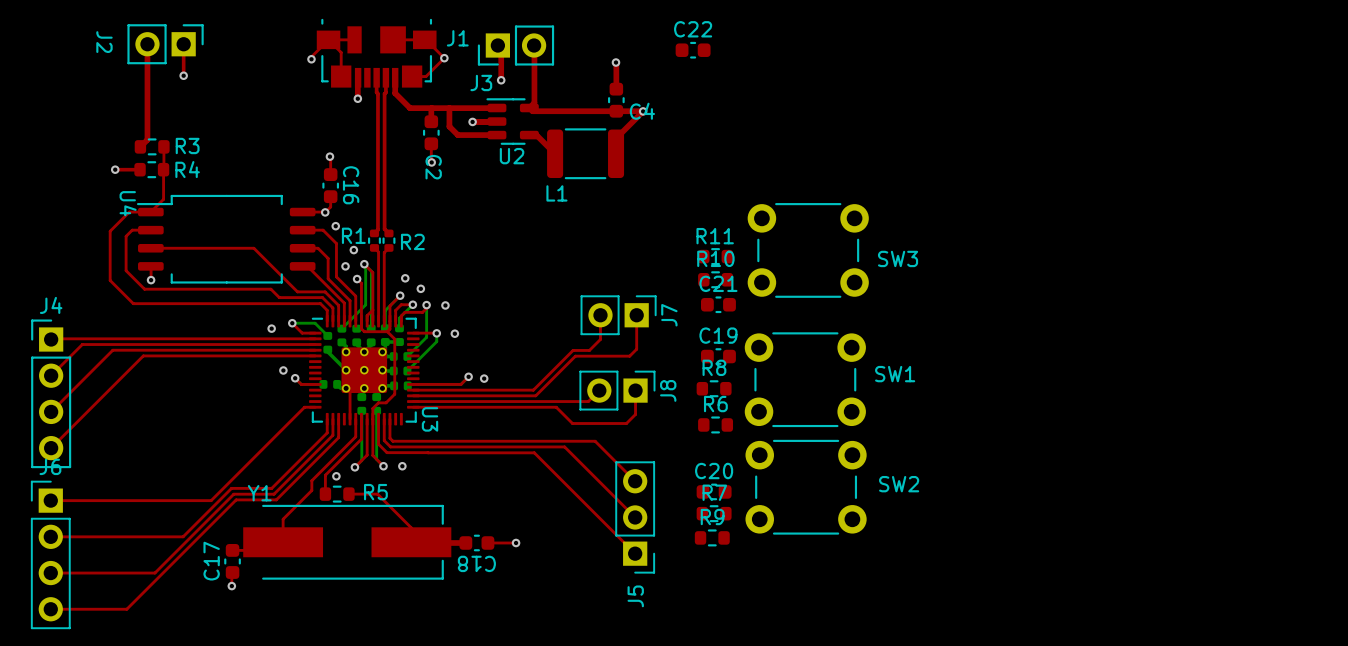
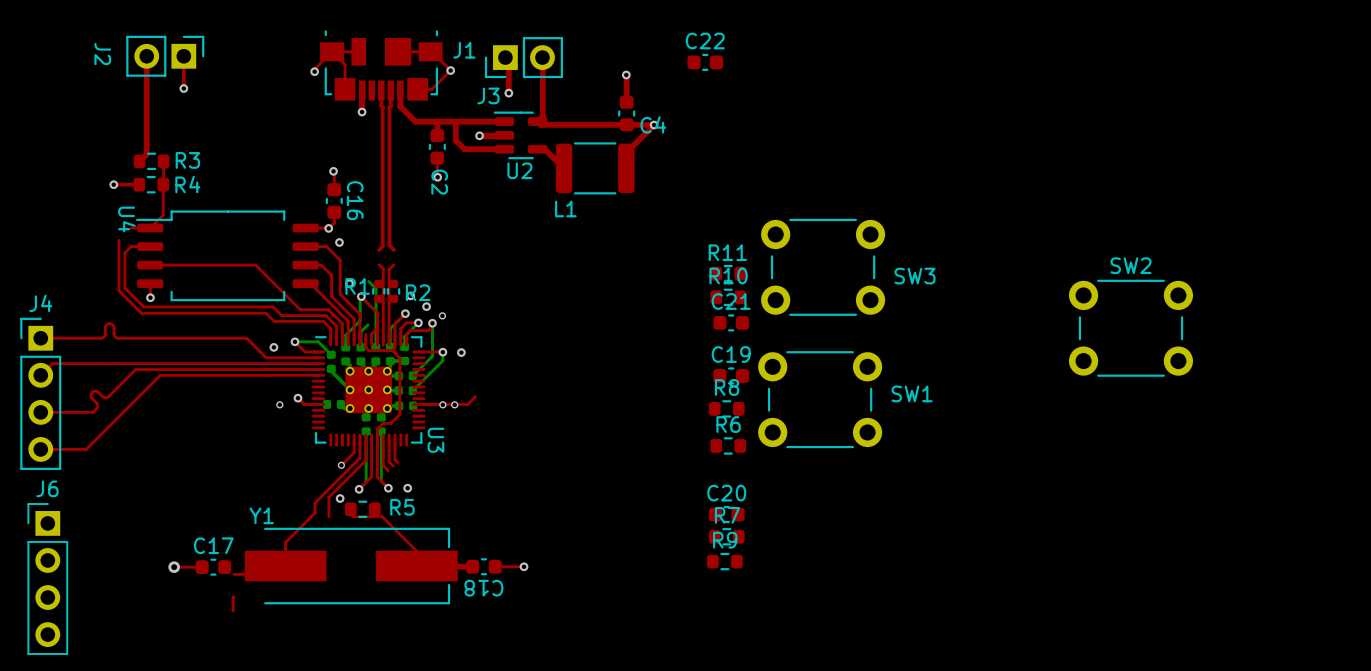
top track: (132, 212) (129, 212) (110, 231) (110, 280) (133, 303) (320, 303) -> (119, 240) (119, 290) (141, 313) (266, 313) (274, 321) (323, 321)
R1 position: (374, 240) -> (378, 291)
R2 position: (388, 240) -> (393, 291)
via: (353, 250) -> none
top track: (364, 264) (372, 272) (372, 295) -> (360, 295) (377, 313)
via: (364, 264) -> none
bottom track: (365, 265) (365, 304) (341, 328) -> (375, 311) (360, 295) (360, 320) (345, 335) (345, 347)
top track: (357, 279) (361, 283) (361, 321) -> none
via: none -> (442, 315)
via: (445, 305) -> none
bottom track: none -> (367, 324) (360, 331) (360, 347)
top track: (600, 315) (600, 339) (589, 350) (573, 350) (533, 390) (413, 390) -> none
J7: (618, 315) -> none
top track: (636, 315) (636, 349) (629, 356) (575, 356) (535, 395) (413, 395) -> none
top track: (51, 338) (264, 338) -> (40, 338) (102, 338) (105, 335) (105, 325) (110, 323) (113, 326) (114, 336) (117, 338) (246, 338) (266, 357)
top track: (82, 344) (51, 375) -> (80, 363) (52, 363) (40, 375)
top track: (136, 350) (112, 350) (51, 411) -> (135, 369) (107, 397) (103, 397) (96, 391) (92, 392) (91, 396) (97, 405) (92, 412) (40, 412)
top track: (160, 355) (143, 355) (51, 448) -> (160, 375) (85, 450) (41, 450)
via: (283, 370) -> none
via: (468, 376) -> none
via: (484, 378) -> none
via: none -> (279, 404)
via: none -> (442, 404)
via: none -> (454, 404)
top track: (346, 388) (350, 392) (350, 419) -> (341, 465) (354, 452) (354, 440)
top track: (599, 390) (588, 401) (413, 401) -> none
J8: (617, 390) -> none
top track: (635, 390) (635, 414) (626, 423) (572, 423) (556, 407) (413, 407) -> none
J4 position: (51, 393) -> (40, 393)
top track: (315, 407) (304, 407) (211, 500) (50, 500) -> none
top track: (327, 419) (327, 432) (271, 488) (231, 488) (183, 536) (50, 536) -> none
top track: (332, 419) (332, 435) (274, 494) (233, 494) (154, 573) (50, 573) -> none
top track: (338, 419) (338, 437) (276, 499) (236, 499) (126, 609) (50, 609) -> none
top track: (392, 441) (595, 441) (635, 481) -> none
via: none -> (341, 465)
top track: (388, 444) (390, 446) (564, 446) (635, 517) -> none
top track: (383, 449) (386, 452) (427, 452) -> none
top track: (428, 452) (534, 452) (635, 553) -> none
SW2 name position: SW2 (899, 484) -> SW2 (1130, 265)
SW2 position: (806, 487) -> (1130, 328)
R5 position: (337, 494) -> (362, 509)
J5: (635, 517) -> none
top track: none -> (174, 567) (202, 567)
via: none -> (174, 567)
C17 rotation: 0° (232, 561) -> 90° clockwise (213, 567)
C17 position: (232, 561) -> (213, 567)
via: (231, 586) -> none

